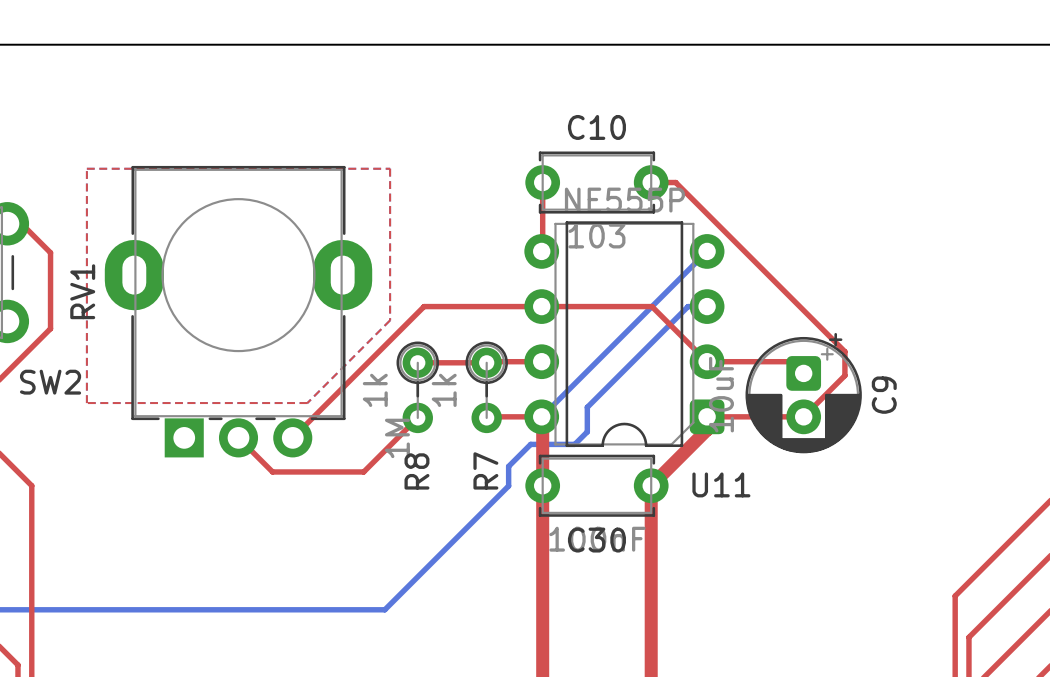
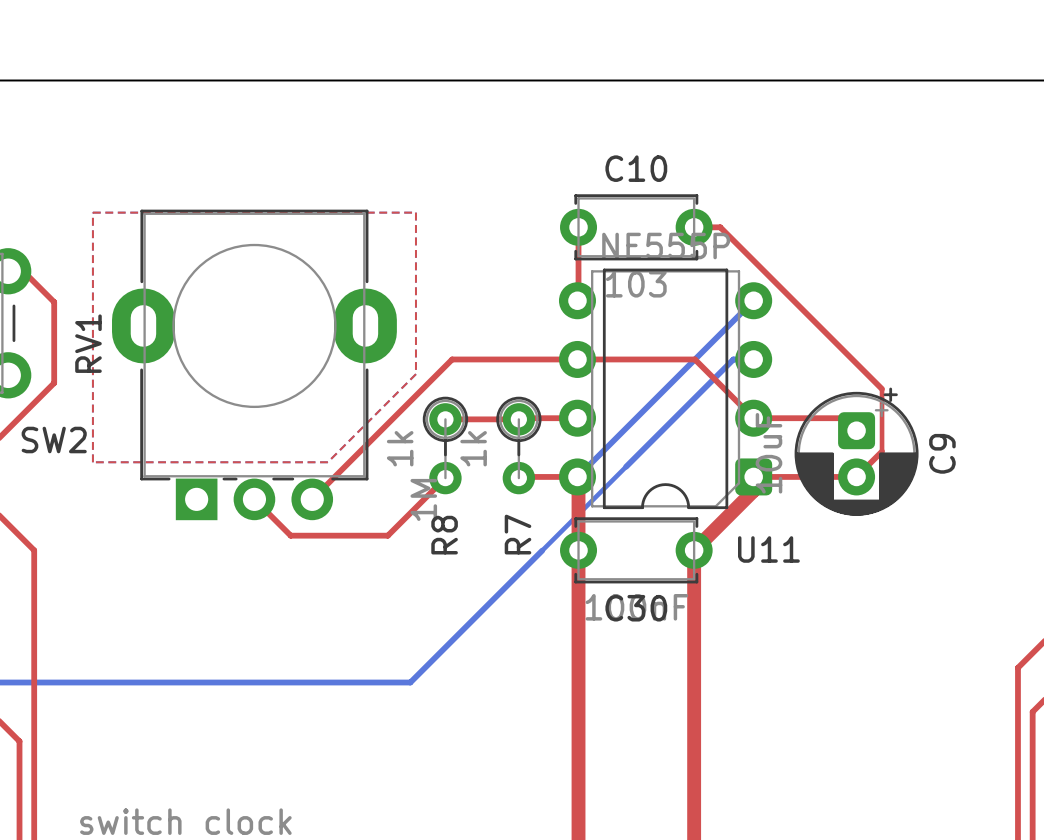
top track: (827, 334) (844, 351) (844, 375) (827, 392) -> (882, 389) (882, 451)
bottom track: (587, 407) (587, 431) (574, 444) (530, 444) (508, 466) (508, 486) -> (626, 466) (542, 550)

